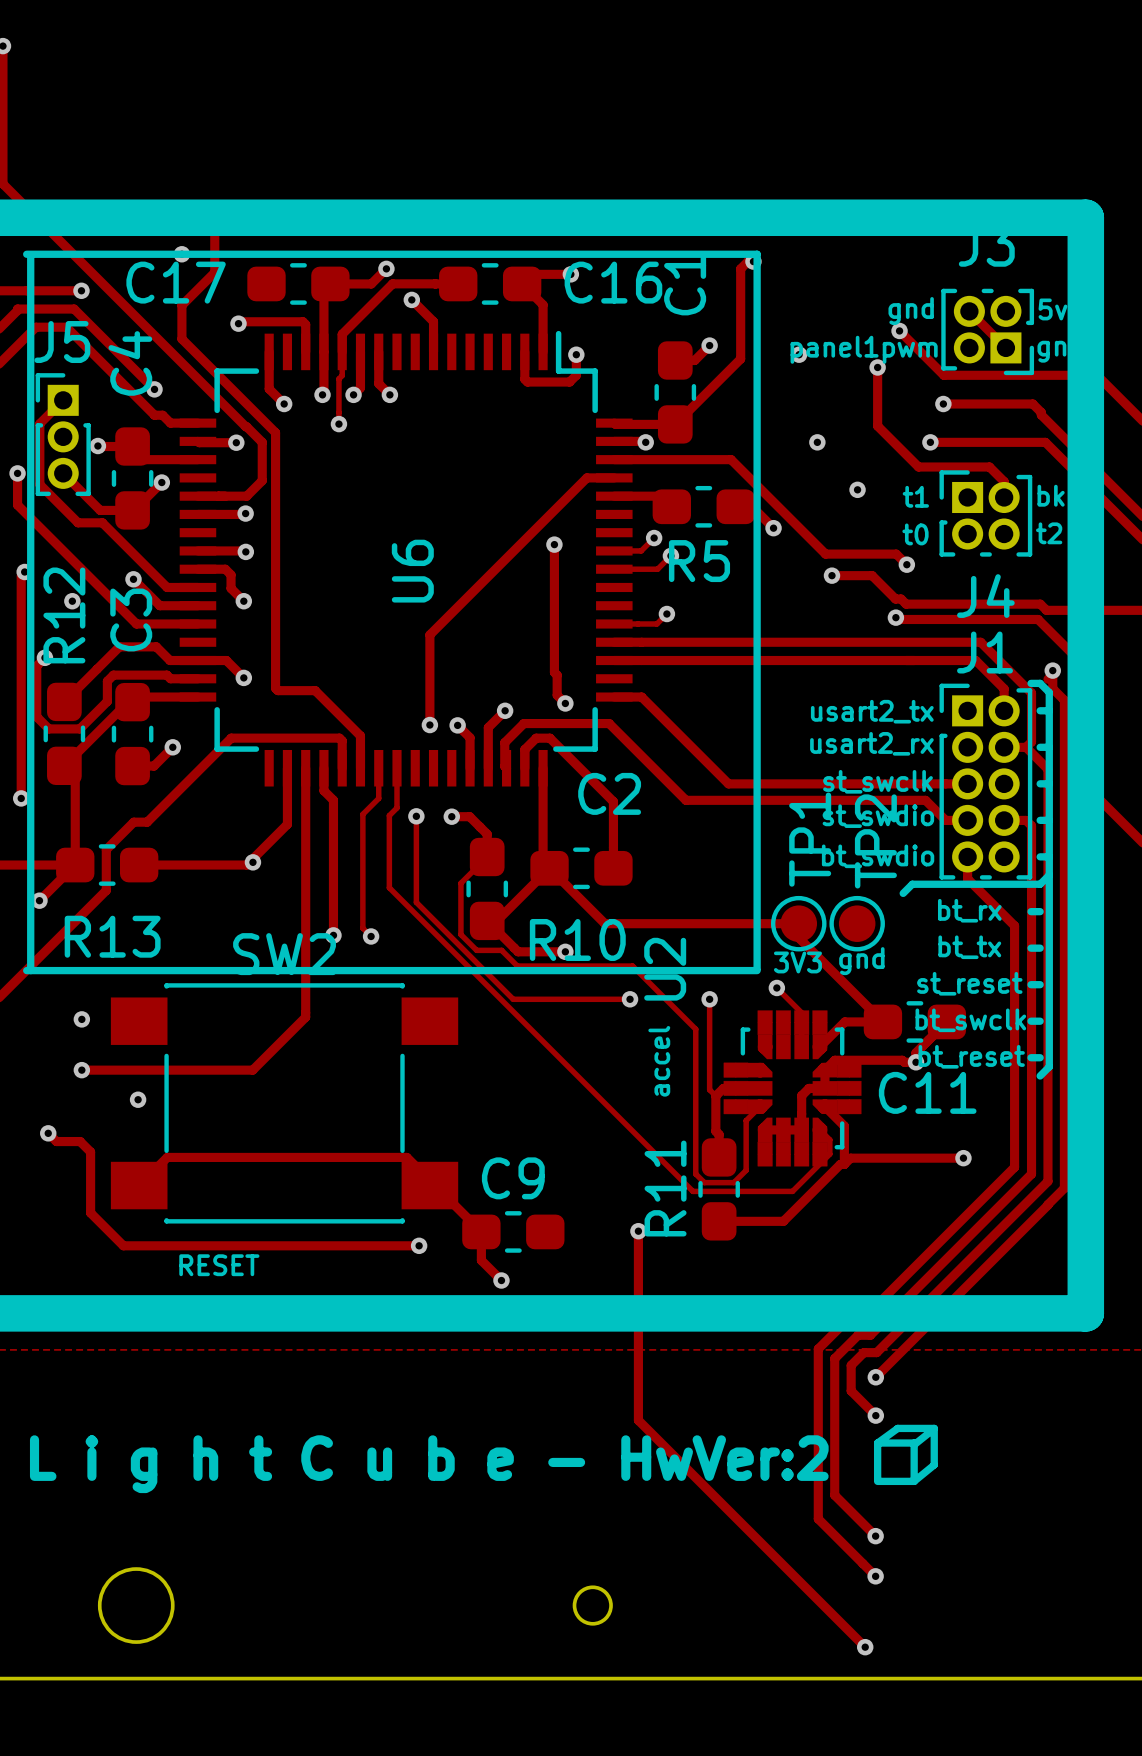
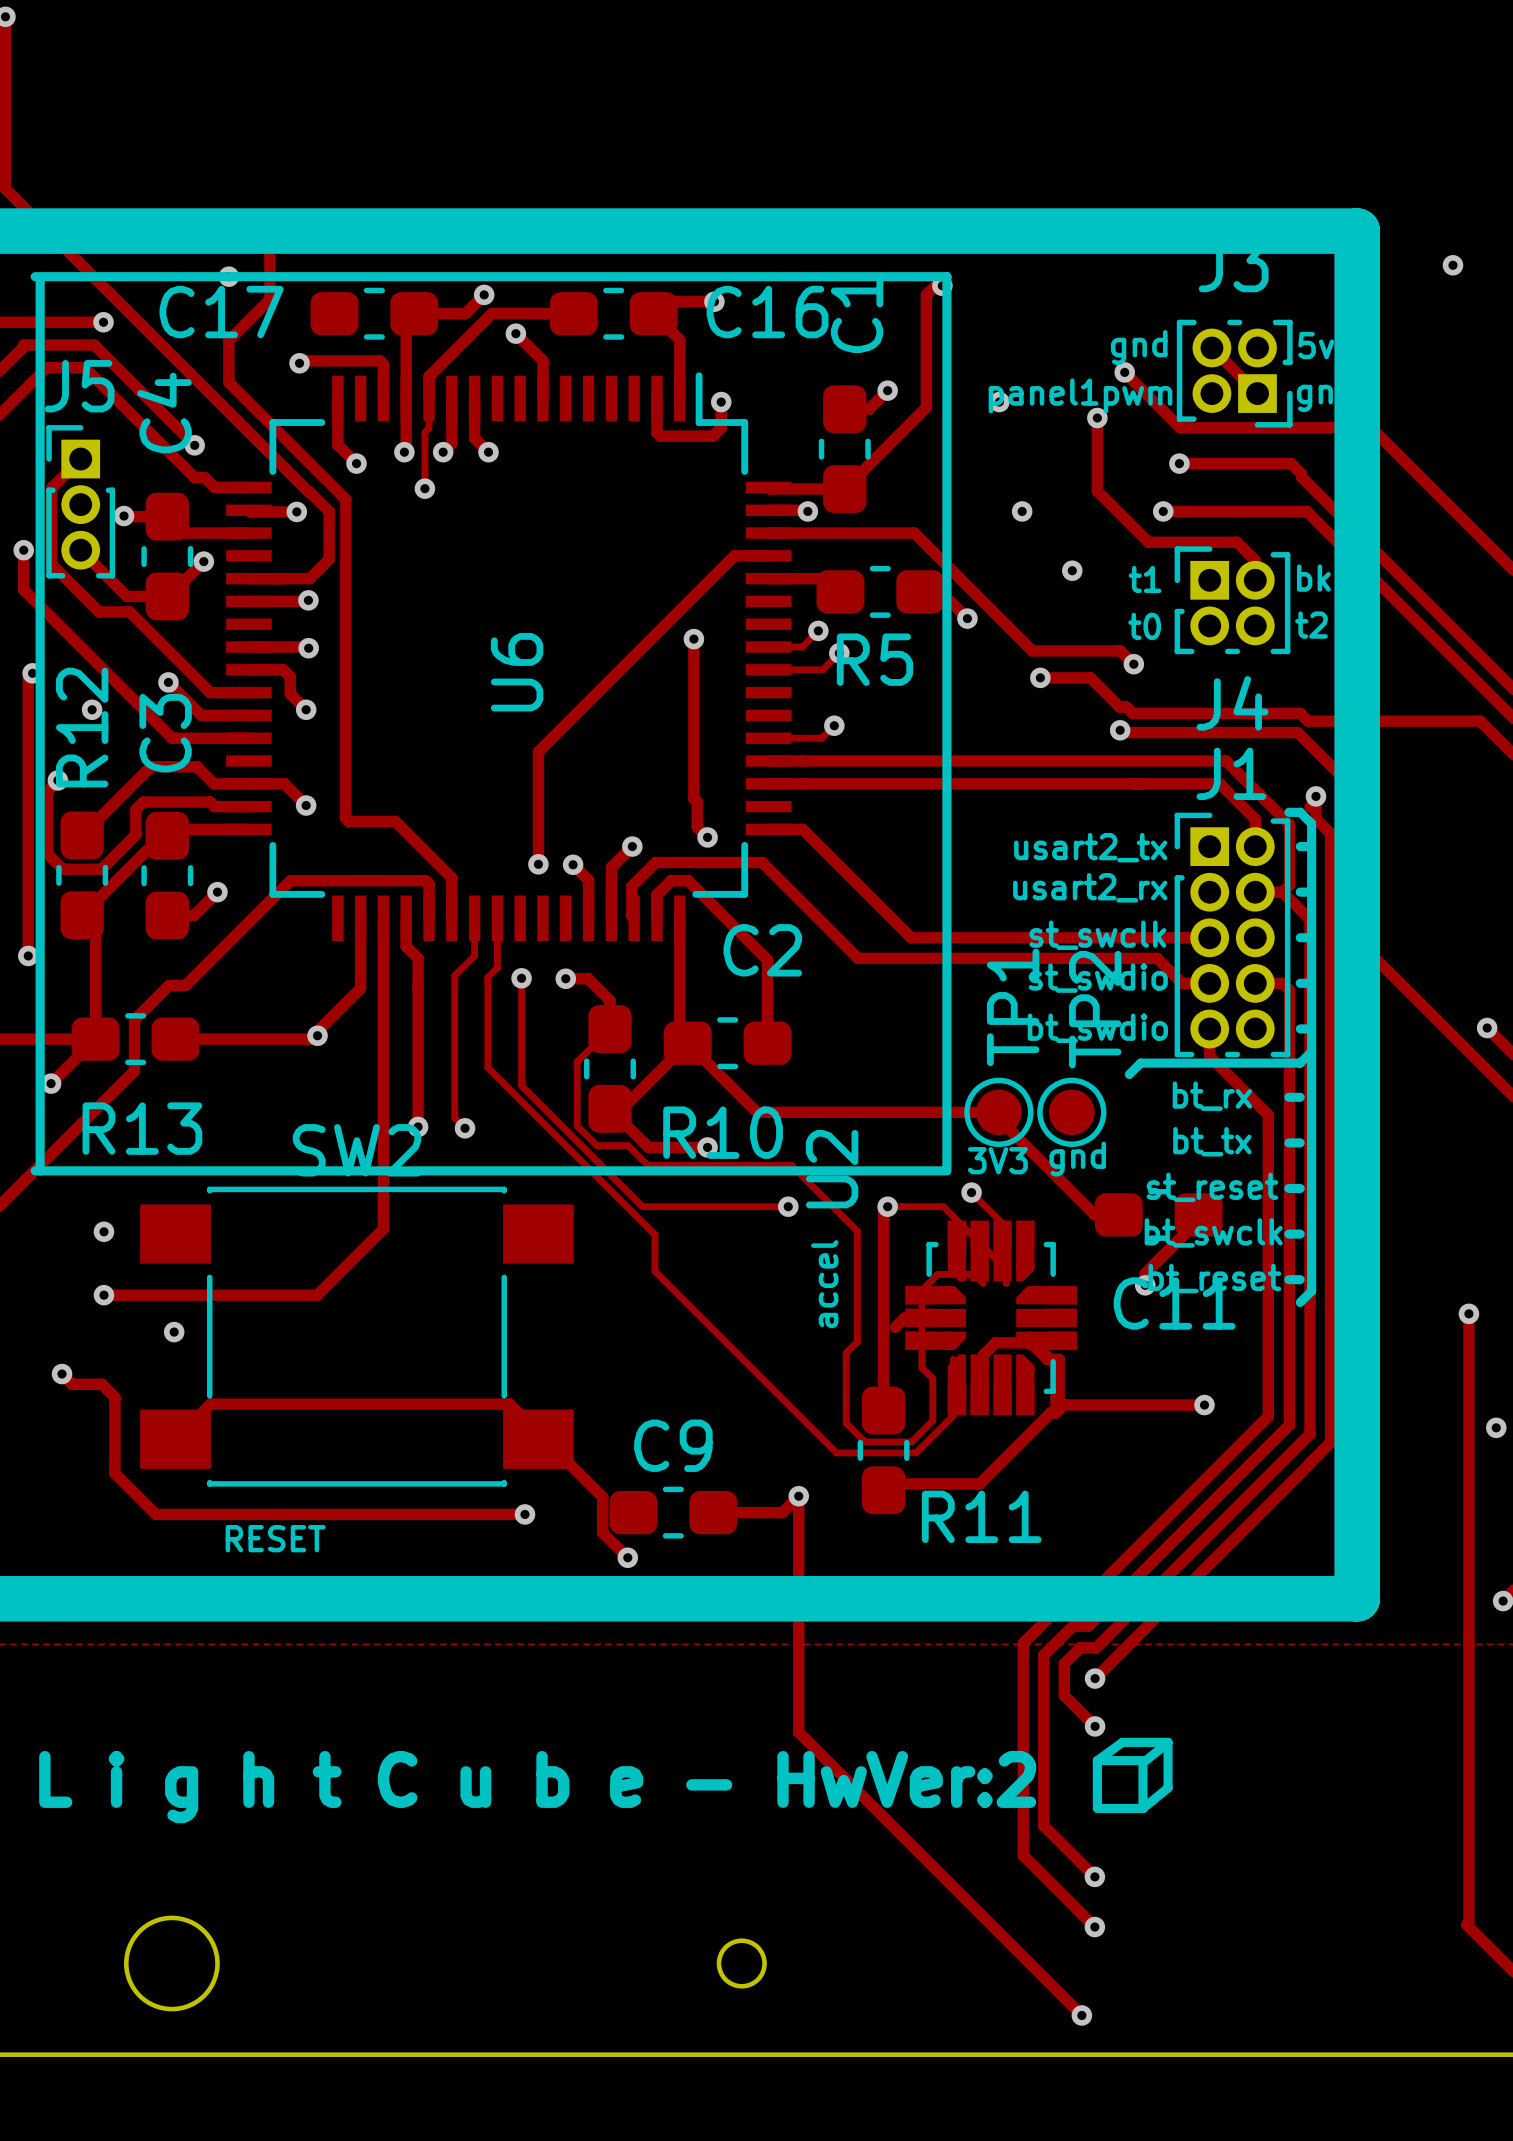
track: none -> (998, 1118) (1094, 1214) (1118, 1214)
track: (798, 937) (882, 1021) (844, 1021) (819, 1046) -> none
track: (709, 999) (709, 1089) (715, 1096) (715, 1131) (719, 1134) (719, 1157) -> none
track: (685, 1018) (695, 1029) (695, 1174) (704, 1182) (733, 1182) -> (857, 1231) (857, 1341) (846, 1353) (846, 1423) (865, 1441) (911, 1441) (917, 1435)
track: (523, 1021) (692, 1191) (792, 1191) (829, 1154) (829, 1139) (819, 1129) -> (654, 1234) (654, 1271) (836, 1452) (916, 1452) (953, 1415) (953, 1359)
C11 position: (914, 1021) -> (1158, 1214)
track: none -> (1006, 1283) (1006, 1269) (943, 1206) (887, 1206) (883, 1210) (883, 1410)
track: (915, 1062) (904, 1062) (902, 1060) (834, 1060) (824, 1070) (824, 1088) (808, 1088) (801, 1095) (801, 1129) (765, 1129) -> none
track: (760, 1106) (746, 1120) (746, 1170) -> (983, 1283) (974, 1274) (937, 1274) (921, 1290) (921, 1367) (932, 1378) (932, 1420)
track: none -> (983, 1366) (983, 1355) (995, 1342) (1030, 1342) (1047, 1359) (1059, 1359) (1059, 1400) (1063, 1405)
R11 name rotation: 0° (665, 1188) -> 90° clockwise (981, 1516)
R11 name position: R11 (665, 1188) -> R11 (981, 1516)
R11 position: (719, 1189) -> (883, 1450)
C9 position: (513, 1231) -> (673, 1512)
track: none -> (798, 1496) (782, 1512) (713, 1512)

